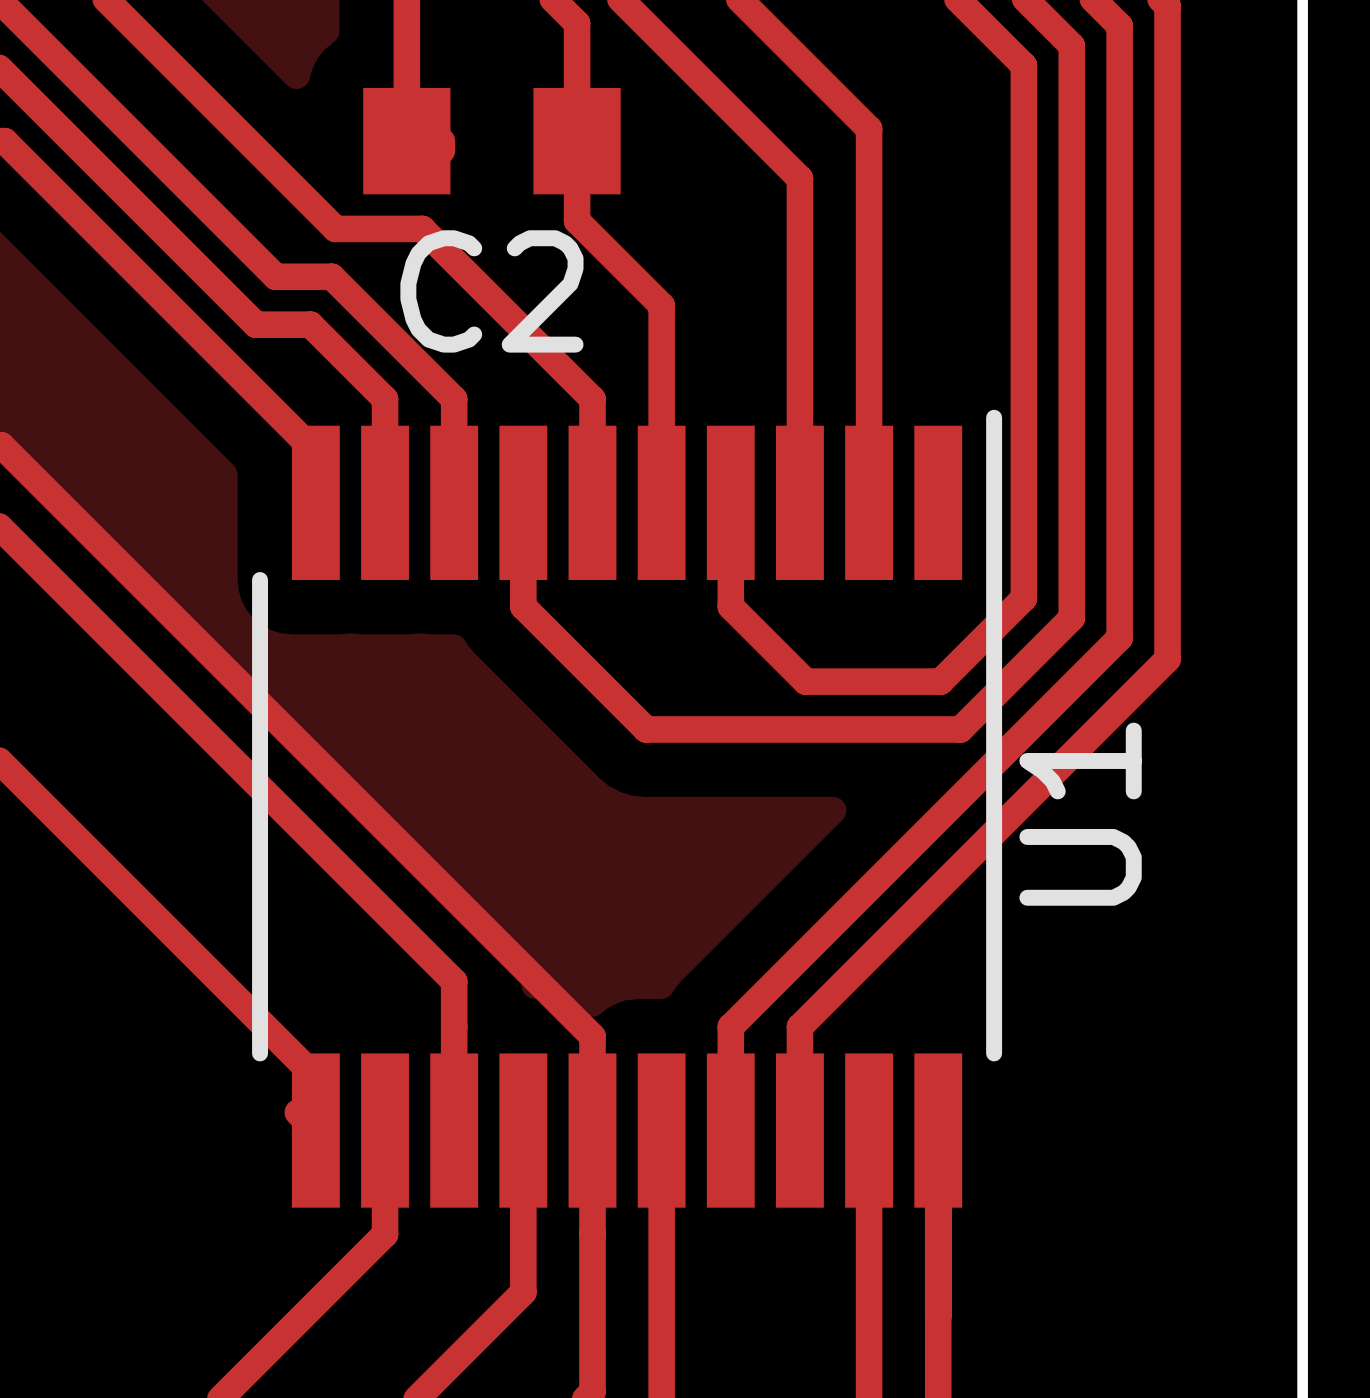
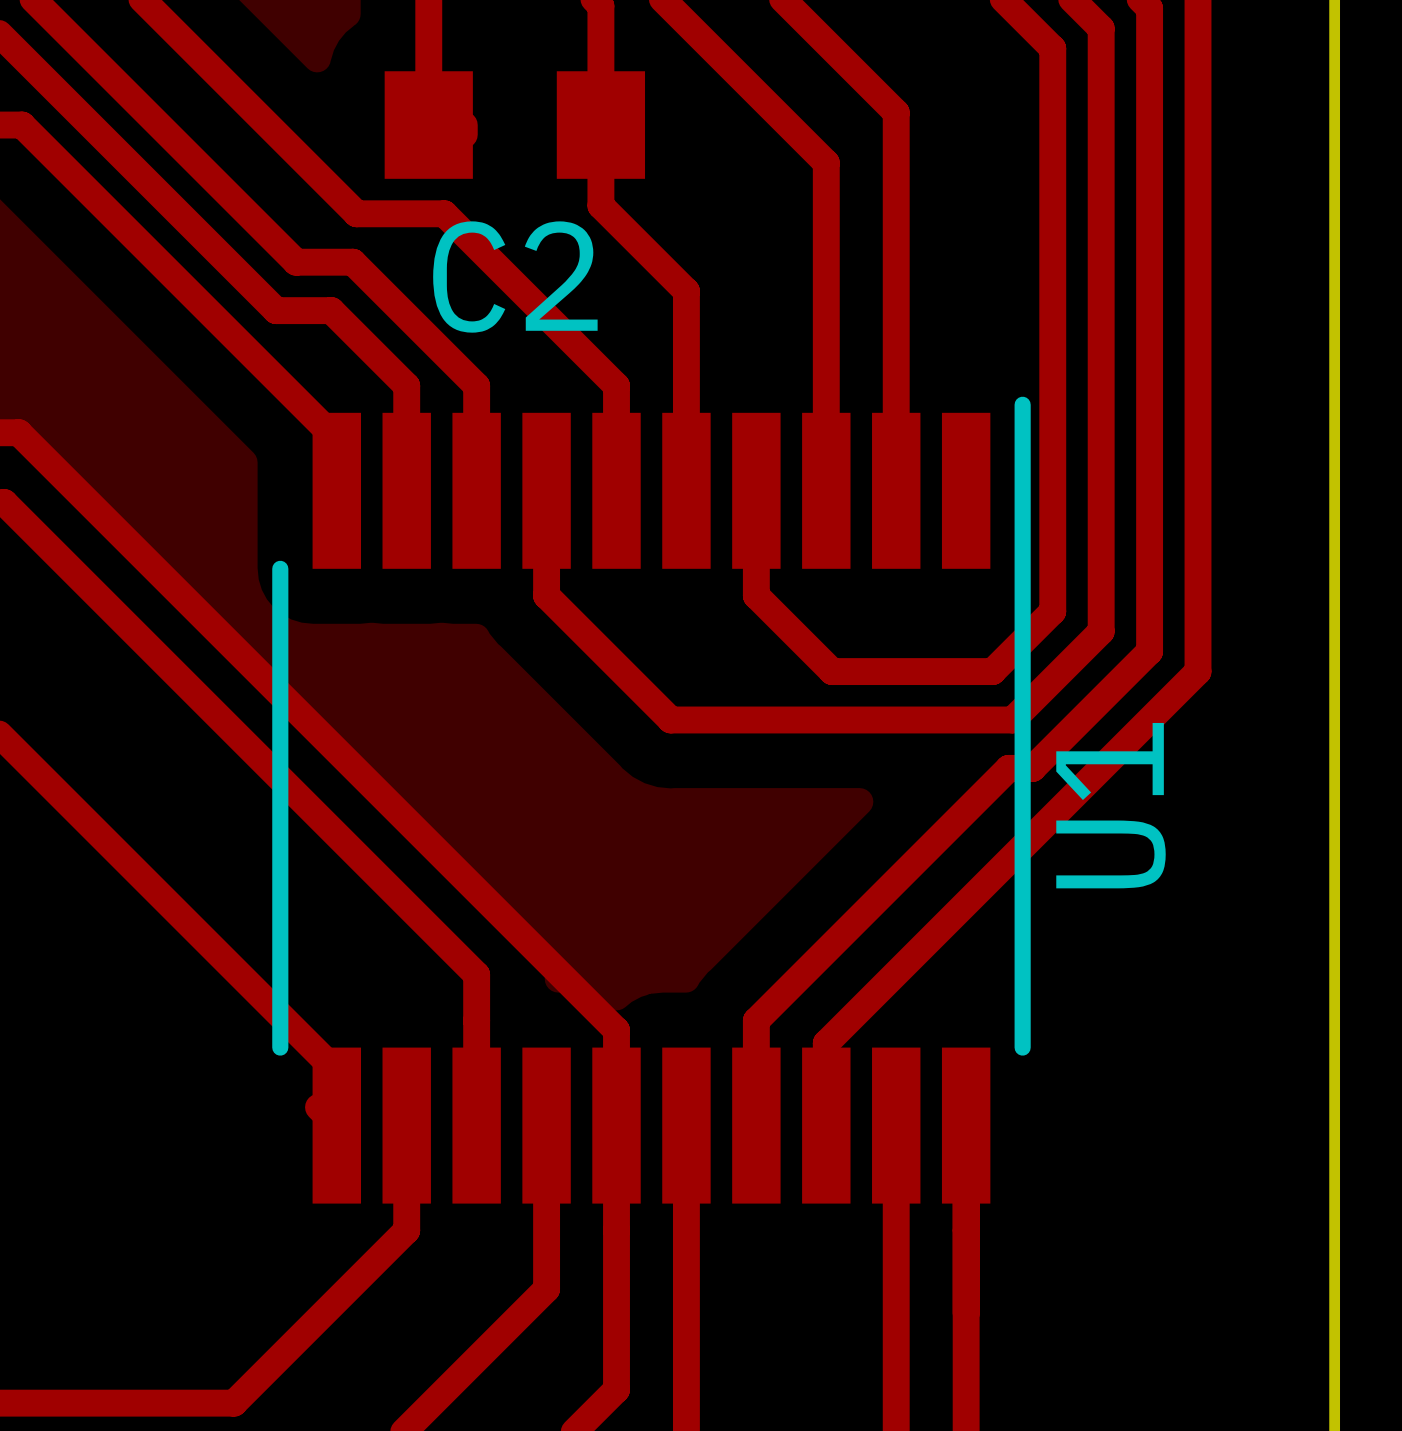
track: (1023, 598) (940, 681) -> (1052, 587) (1052, 611) (992, 671) (968, 671)
track: (1071, 618) (960, 729) -> (1101, 607) (1101, 631) (1012, 719) (988, 719)
track: (1119, 637) (980, 777) -> (1149, 627) (1149, 651) (1032, 768) (1008, 768)
track: (1167, 659) (799, 1026) (799, 1049) -> (1198, 648) (1198, 671) (826, 1043)

